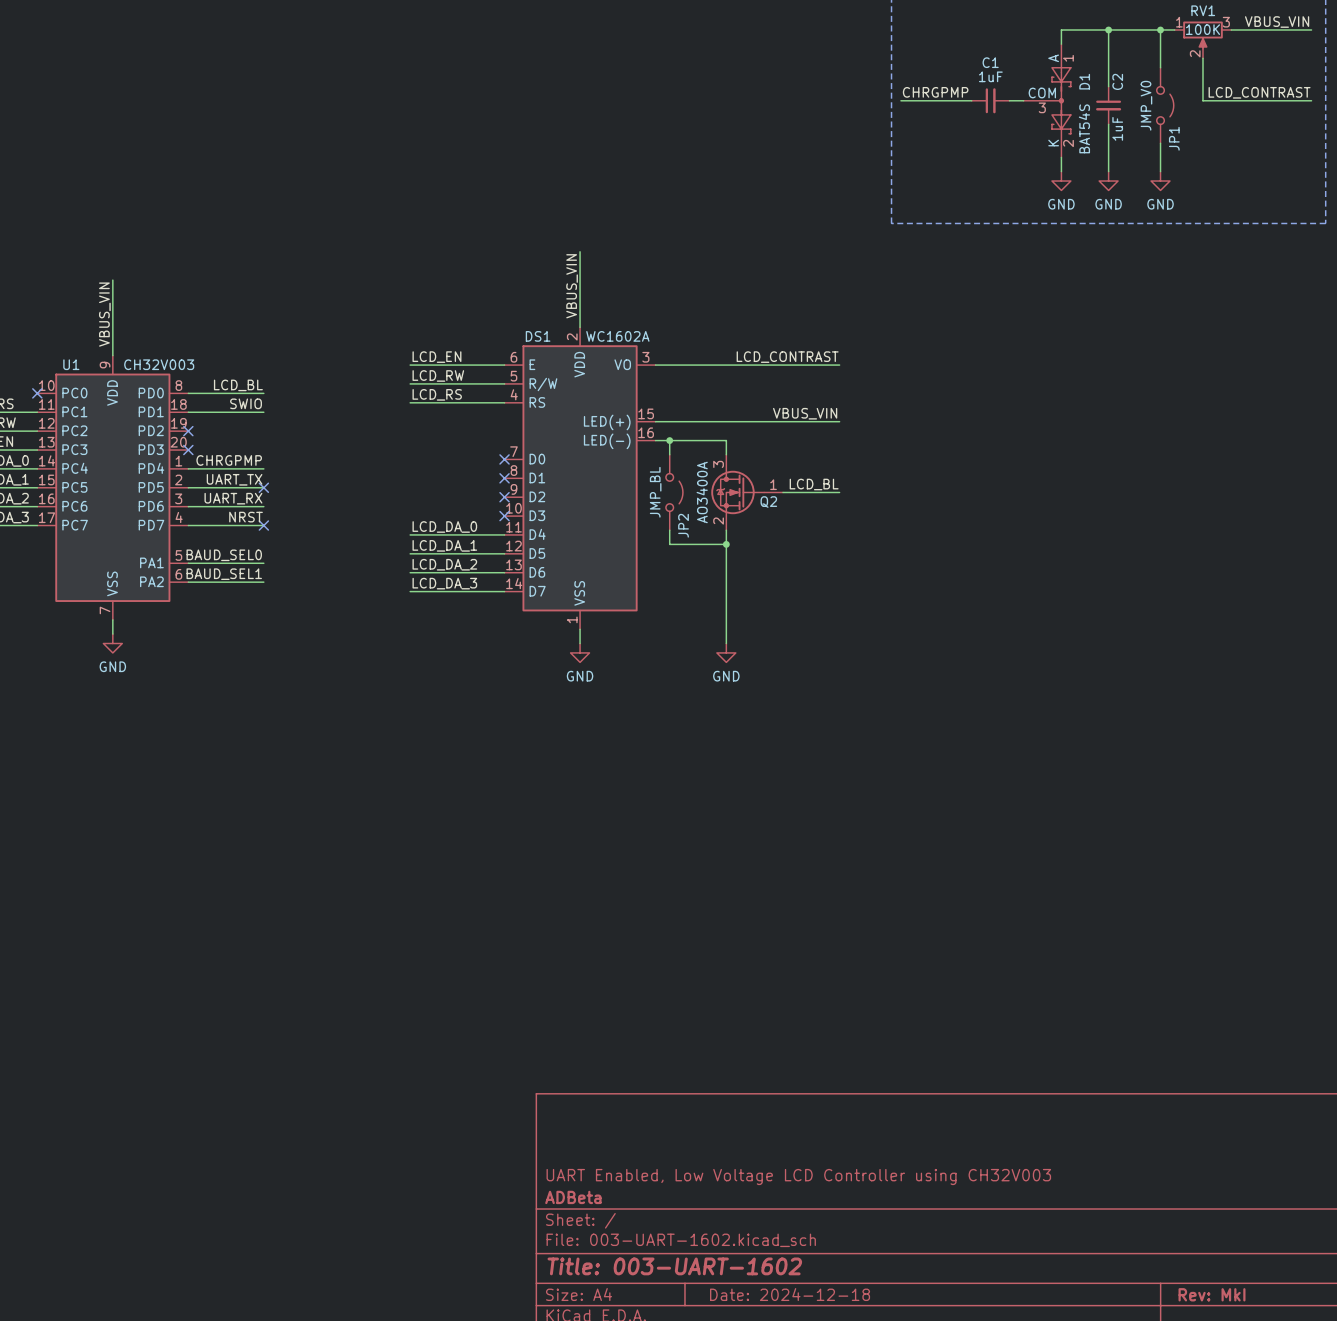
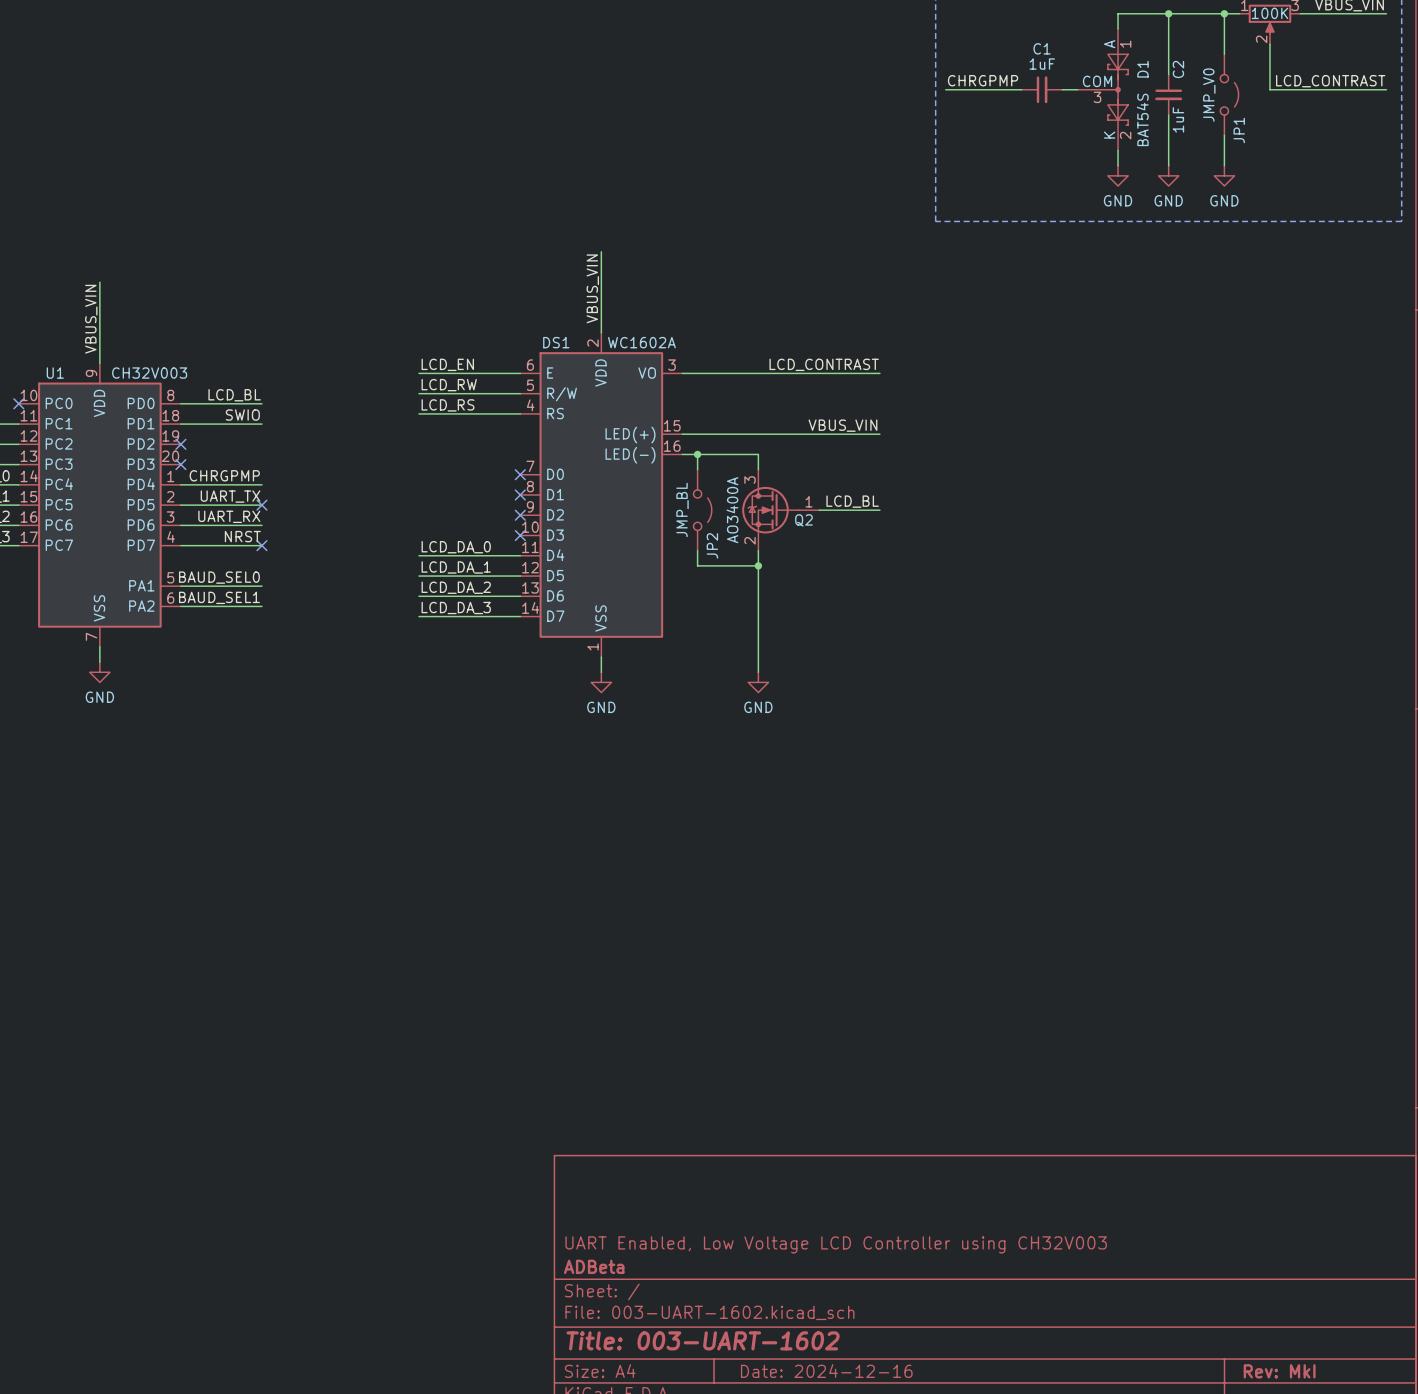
title block: Date: 2024-12-18 (790, 1294) -> Date: 2024-12-16 (826, 1371)

